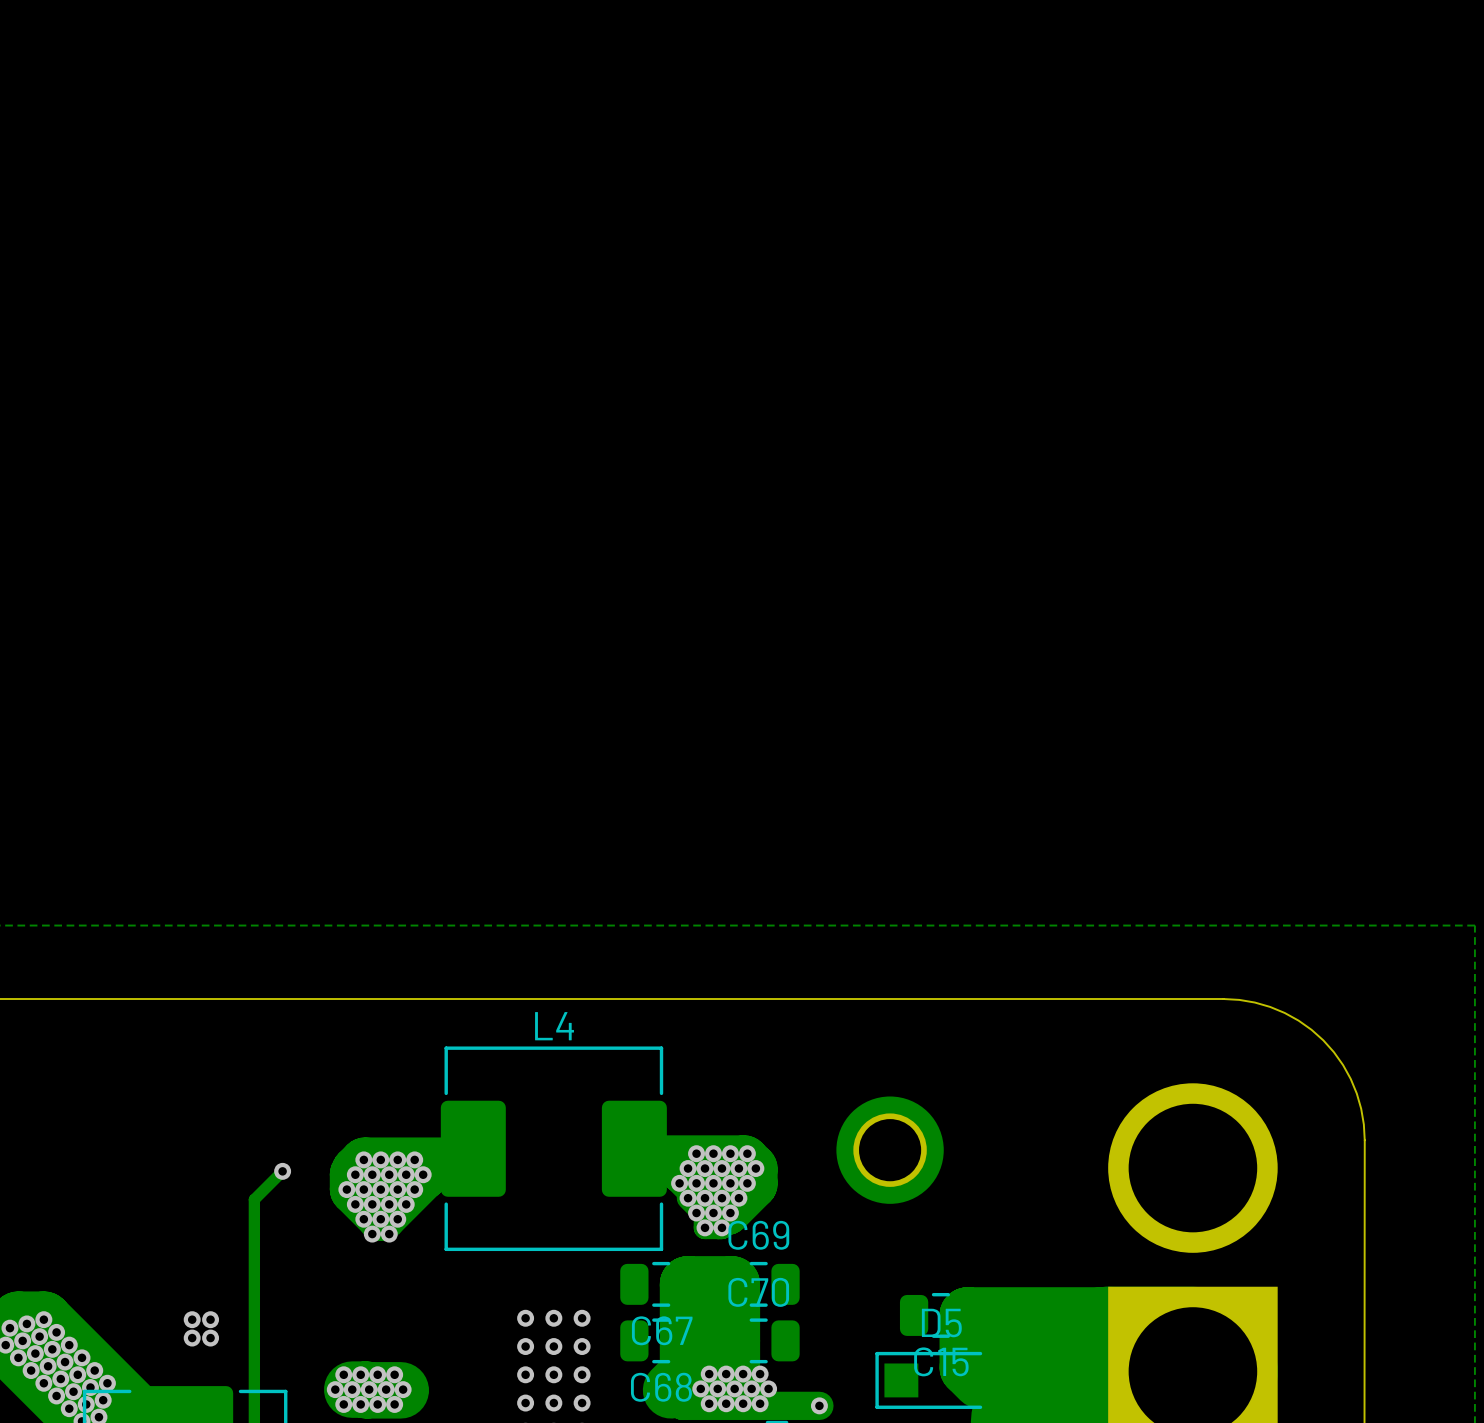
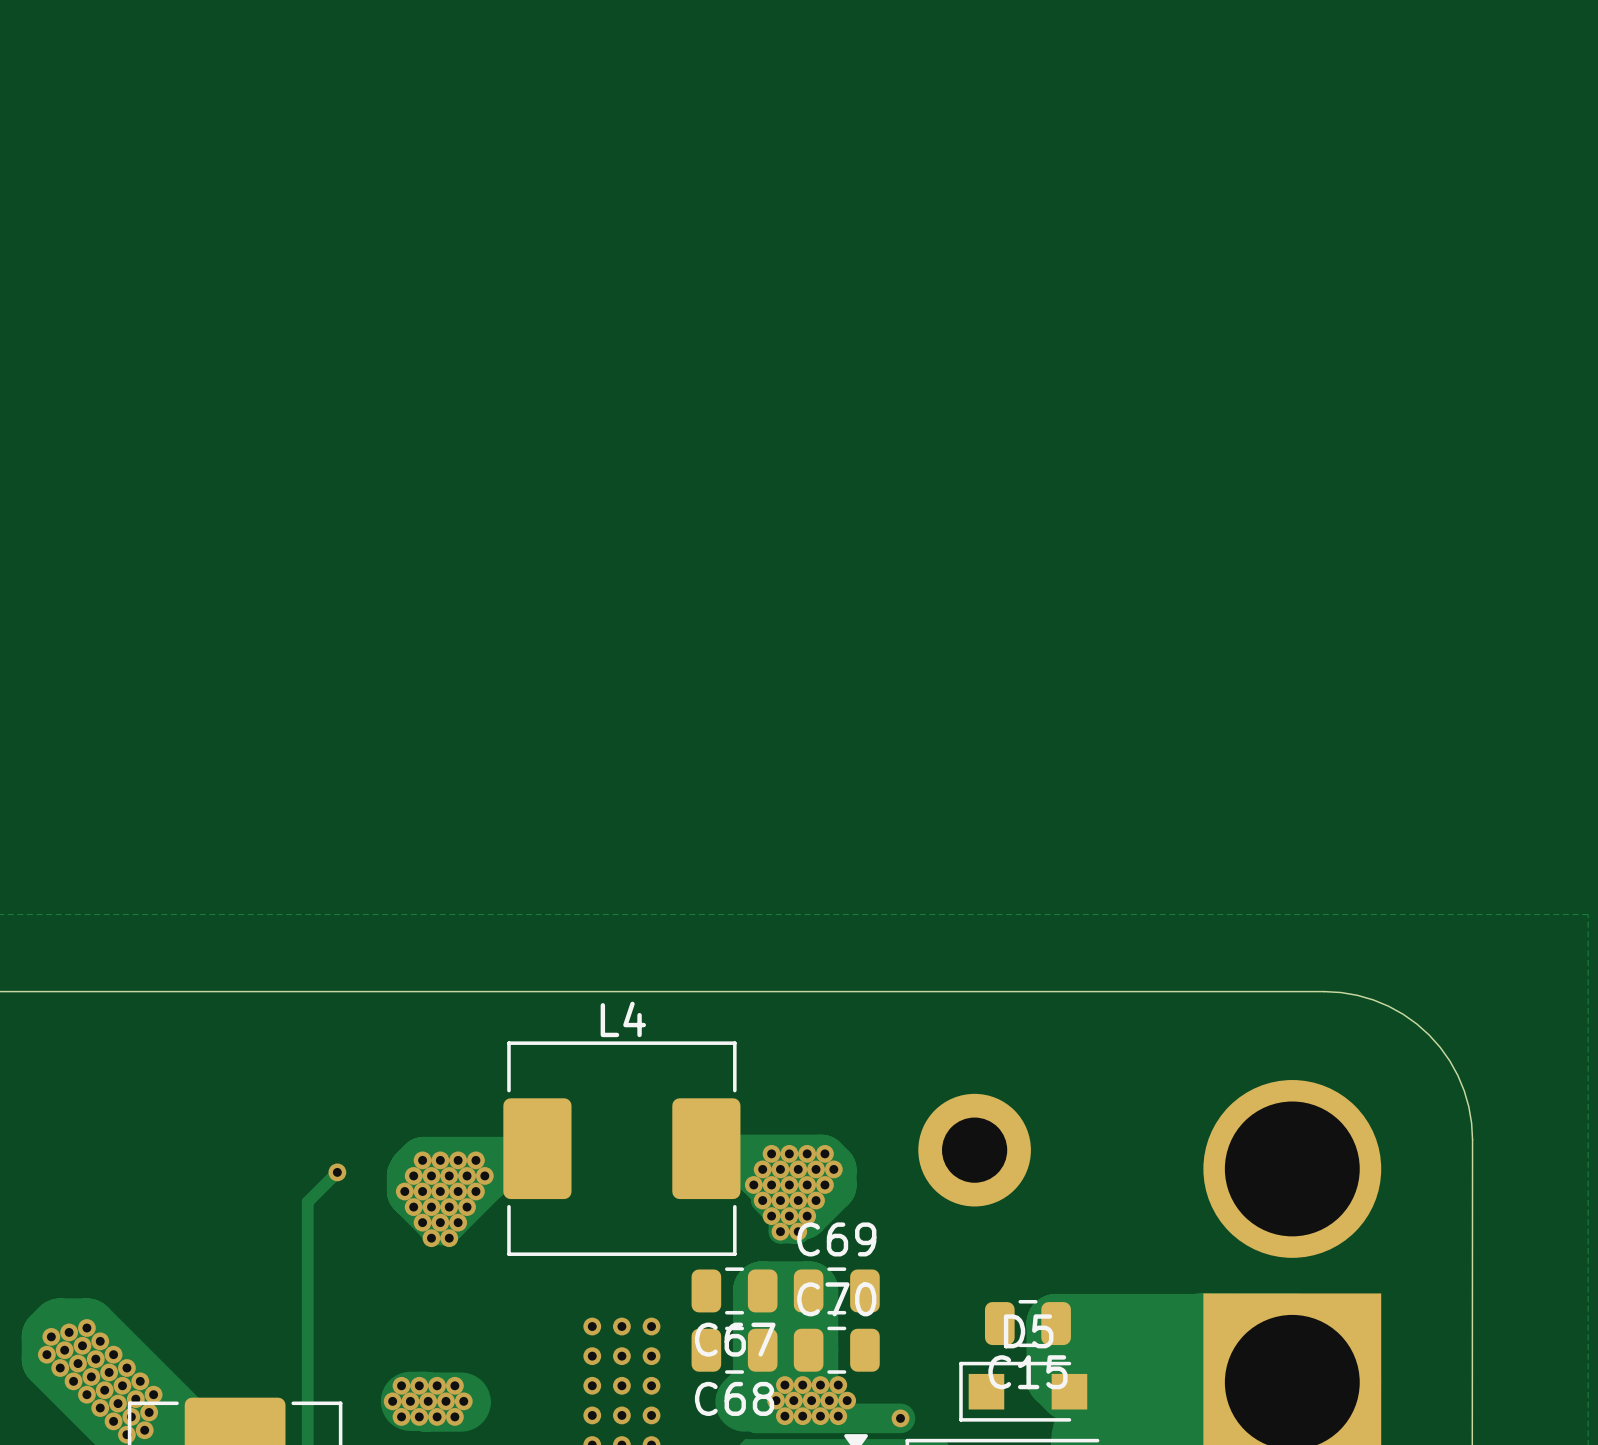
via: (192, 1319) -> none
via: (210, 1319) -> none
via: (192, 1338) -> none
via: (210, 1338) -> none

